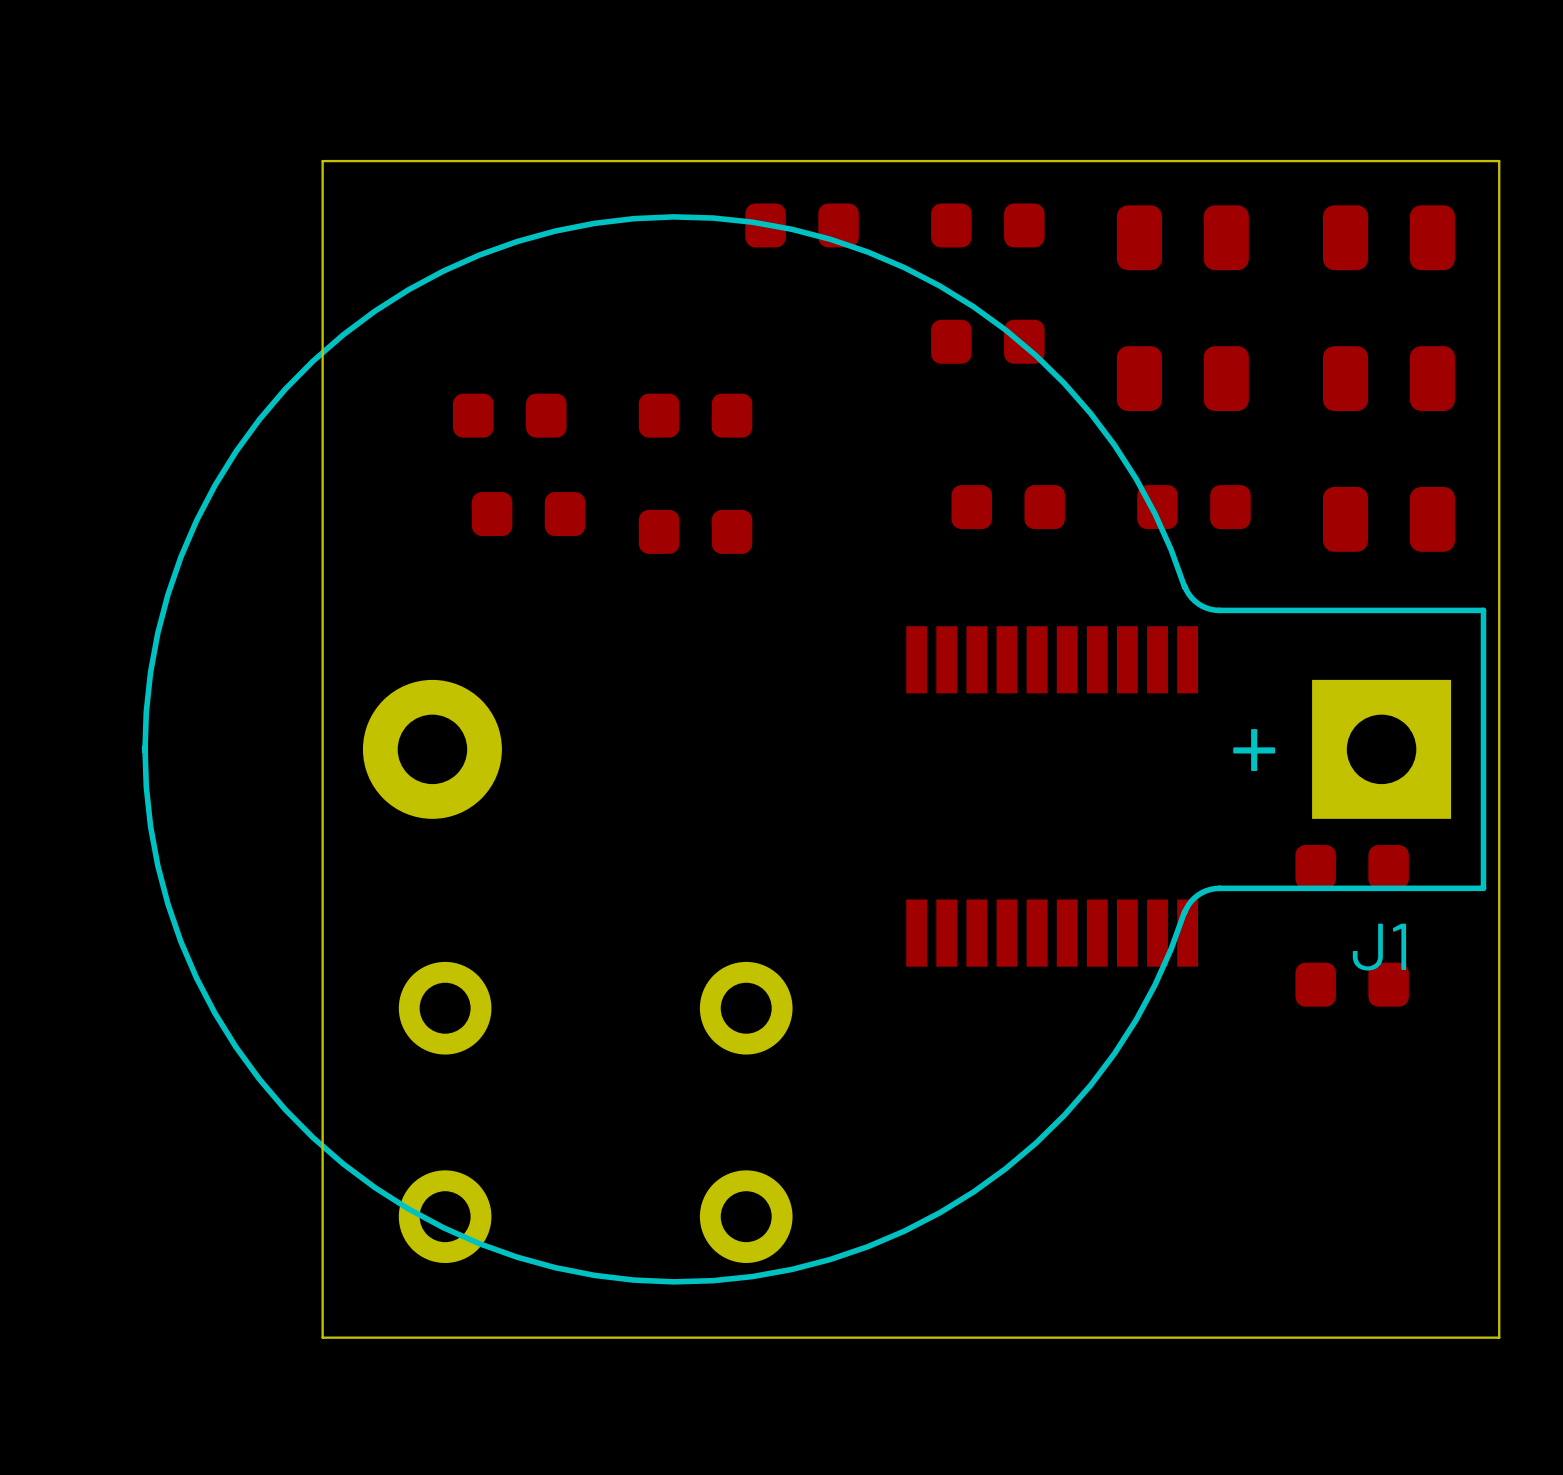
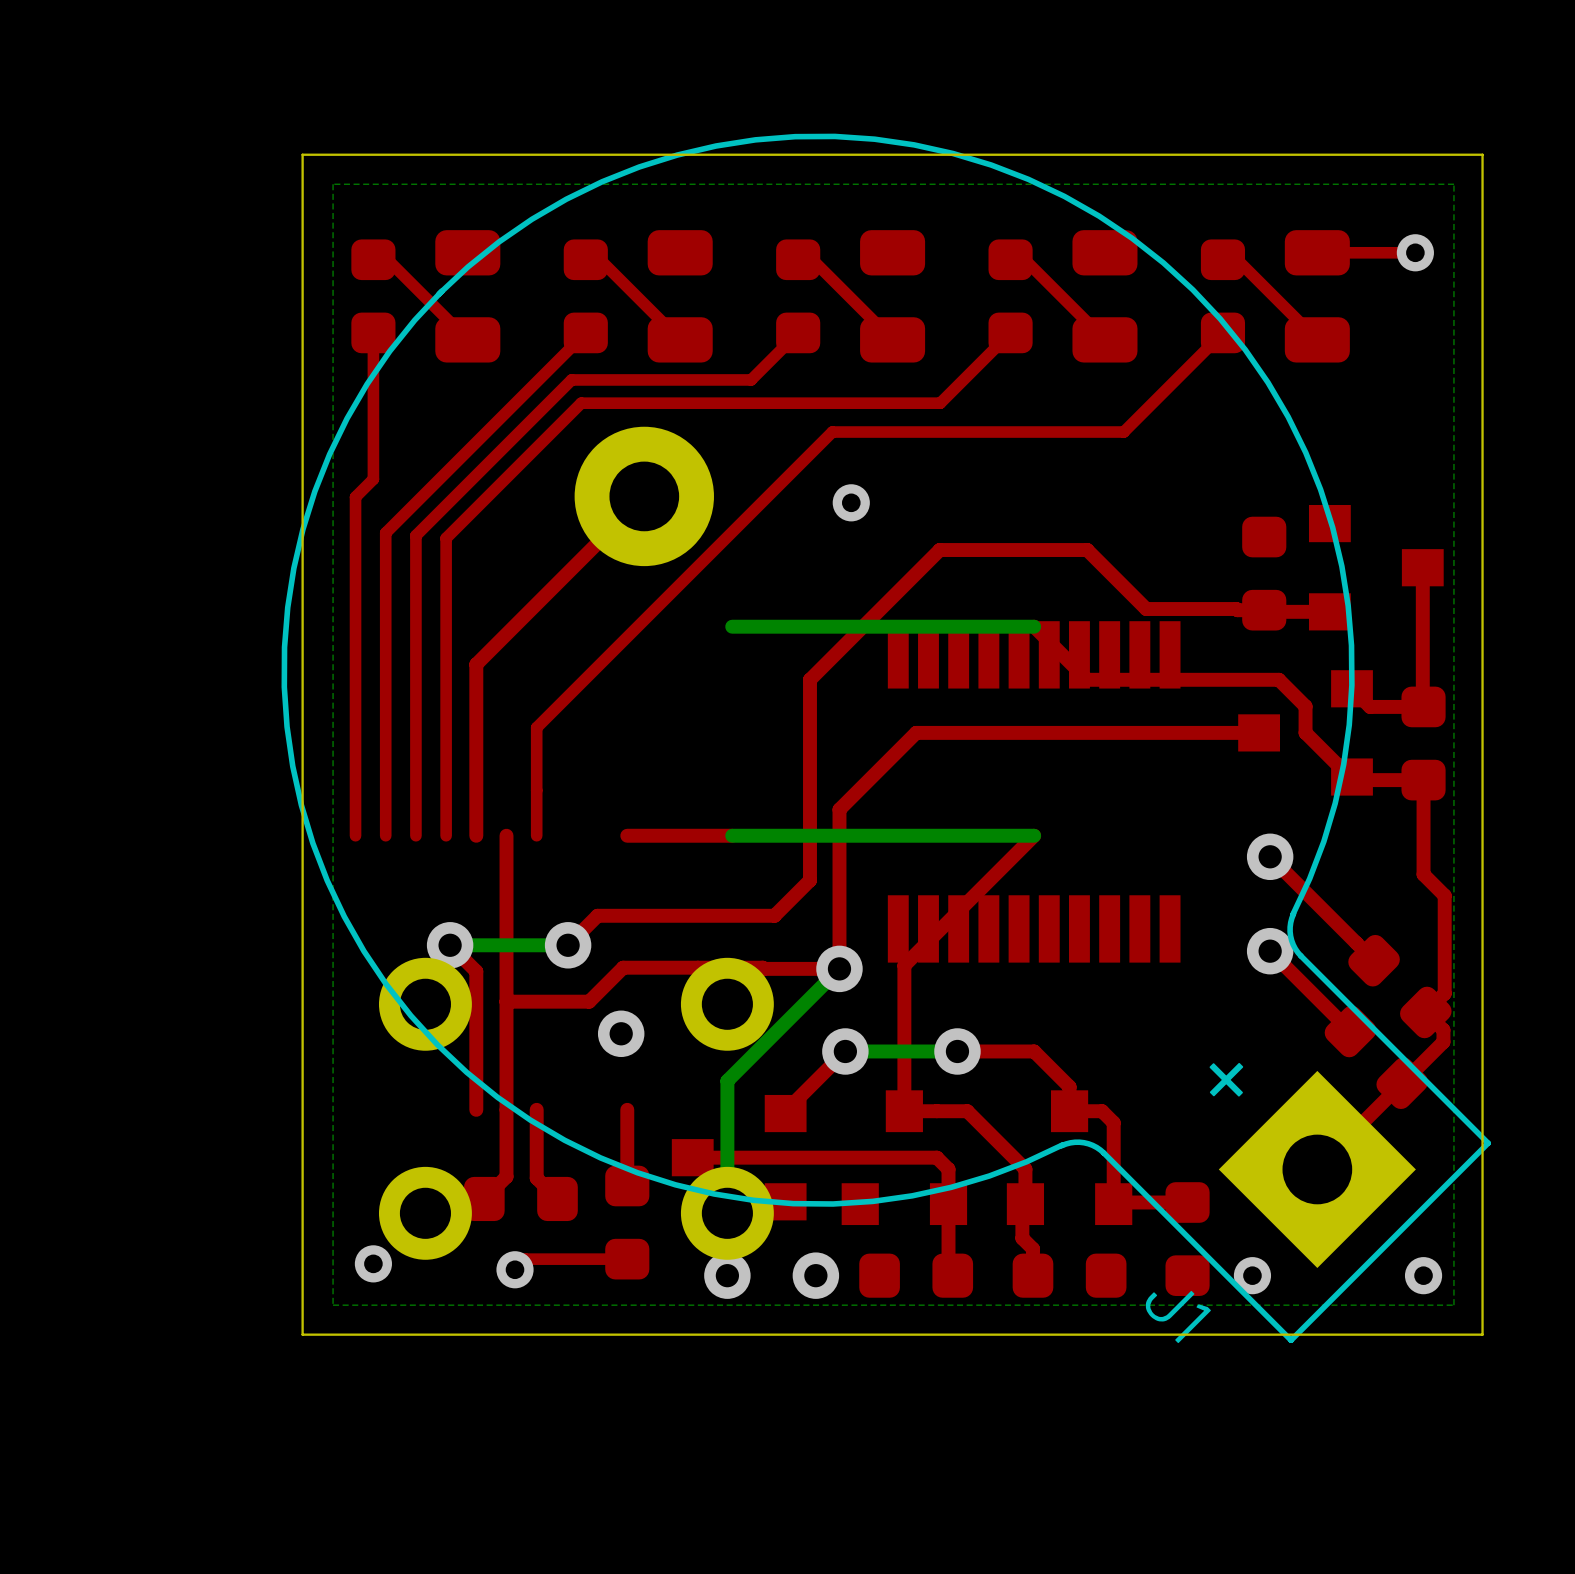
bottom zone outline: none -> (1453, 184) (1453, 1305) (333, 1305) (333, 184) (1453, 184)
part rotation: 0° (802, 225) -> 90° clockwise (798, 296)
part position: (802, 225) -> (798, 296)
part: (987, 225) -> none
part: (1182, 237) -> none
part: (1388, 237) -> none
top track: none -> (1415, 252) (1317, 252)
via: none -> (1415, 252)
top track: none -> (373, 259) (387, 259) (467, 339)
top track: none -> (585, 259) (600, 259) (680, 339)
top track: none -> (798, 259) (812, 259) (892, 339)
top track: none -> (1010, 259) (1024, 259) (1104, 339)
top track: none -> (1222, 259) (1237, 259) (1317, 339)
part: none -> (373, 296)
part: none -> (467, 296)
part: none -> (585, 296)
part: none -> (680, 296)
part: none -> (892, 296)
part: none -> (1010, 296)
part: none -> (1104, 296)
part: none -> (1222, 296)
part: none -> (1317, 296)
top track: none -> (373, 332) (373, 479) (355, 497) (355, 835)
top track: none -> (585, 332) (385, 532) (385, 835)
top track: none -> (798, 332) (751, 379) (571, 379) (415, 535) (415, 835)
top track: none -> (1010, 332) (940, 403) (581, 403) (446, 538) (446, 835)
top track: none -> (1222, 332) (1123, 432) (832, 432) (536, 727) (536, 835)
part: (987, 341) -> none
part: (1182, 378) -> none
part: (1388, 378) -> none
part: (509, 415) -> none
part: (695, 415) -> none
top track: none -> (644, 496) (476, 664) (476, 835)
part: (1008, 507) -> none
part: (1193, 507) -> none
via: none -> (851, 502)
part: (528, 514) -> none
part: (1388, 519) -> none
part: (695, 531) -> none
part: none -> (1376, 567)
top track: none -> (1422, 567) (1423, 706) (1370, 706) (1352, 688)
part: none -> (1264, 573)
top track: none -> (1329, 611) (1146, 609) (1087, 550) (939, 550) (809, 679) (809, 880) (774, 915) (597, 915) (568, 945)
top track: none -> (1034, 626) (1087, 679) (1278, 679) (1305, 706) (1305, 732) (1349, 777) (1355, 780) (1423, 780) (1423, 874) (1444, 895) (1444, 993) (1425, 1012) (1443, 1030) (1443, 1041) (1317, 1169)
bottom track: none -> (1034, 626) (732, 626)
top track: none -> (1259, 732) (916, 732) (839, 809) (839, 968) (623, 967) (589, 1001) (506, 1001)
part: none -> (1305, 732)
part: none -> (1423, 743)
J1 rotation: 0° (814, 749) -> 45° clockwise (886, 738)
top track: none -> (506, 835) (506, 1176) (484, 1198)
top track: none -> (732, 835) (627, 835)
top track: none -> (1034, 835) (904, 965) (904, 1111) (967, 1111) (1025, 1169) (1025, 1204) (1022, 1207) (1022, 1238) (1032, 1248) (1032, 1275)
bottom track: none -> (1034, 835) (732, 835)
top track: none -> (1270, 856) (1374, 960)
via: none -> (1270, 856)
part: (1352, 867) -> none
top track: none -> (450, 945) (476, 971) (476, 1109)
via: none -> (450, 945)
bottom track: none -> (568, 945) (450, 945)
via: none -> (568, 945)
top track: none -> (1270, 951) (1350, 1031)
via: none -> (1270, 951)
bottom track: none -> (839, 968) (727, 1080) (727, 1275)
via: none -> (839, 968)
part: (1352, 984) -> none
part: none -> (1399, 986)
via: none -> (621, 1033)
top track: none -> (845, 1051) (785, 1111) (785, 1113)
via: none -> (845, 1051)
top track: none -> (957, 1051) (1034, 1051) (1069, 1086) (1069, 1111) (1102, 1111) (1113, 1122) (1113, 1204) (1115, 1202) (1187, 1202)
bottom track: none -> (957, 1051) (845, 1051)
via: none -> (957, 1051)
part: none -> (1376, 1057)
top track: none -> (536, 1109) (536, 1178) (557, 1198)
top track: none -> (627, 1109) (627, 1185)
top track: none -> (692, 1157) (936, 1157) (948, 1169) (948, 1271) (952, 1275)
part: none -> (739, 1157)
part: none -> (904, 1157)
part: none -> (1069, 1157)
part: none -> (520, 1198)
part: none -> (627, 1222)
part: none -> (1187, 1239)
top track: none -> (627, 1259) (525, 1259) (515, 1269)
via: none -> (373, 1263)
via: none -> (515, 1269)
via: none -> (727, 1275)
via: none -> (815, 1275)
part: none -> (916, 1275)
part: none -> (1069, 1275)
via: none -> (1252, 1275)
via: none -> (1423, 1275)

